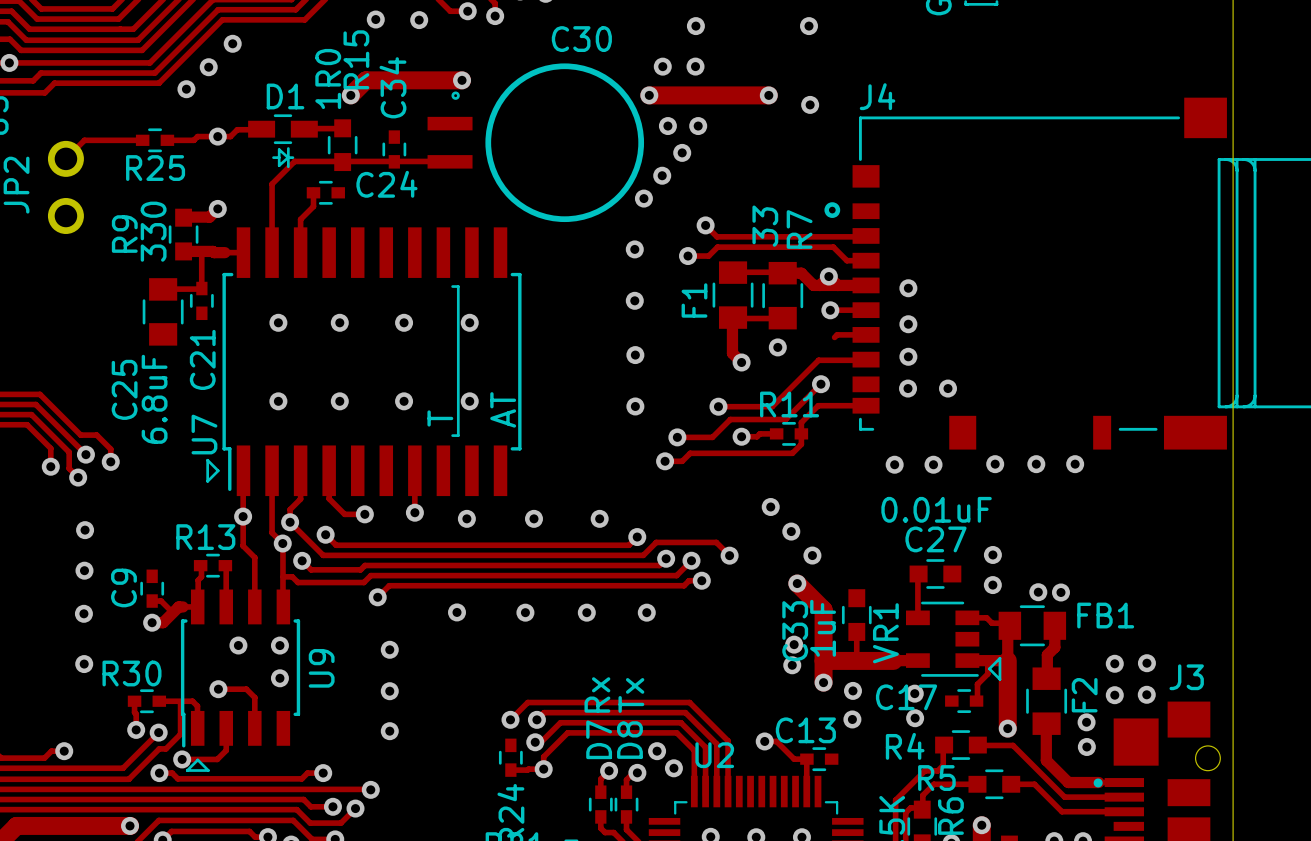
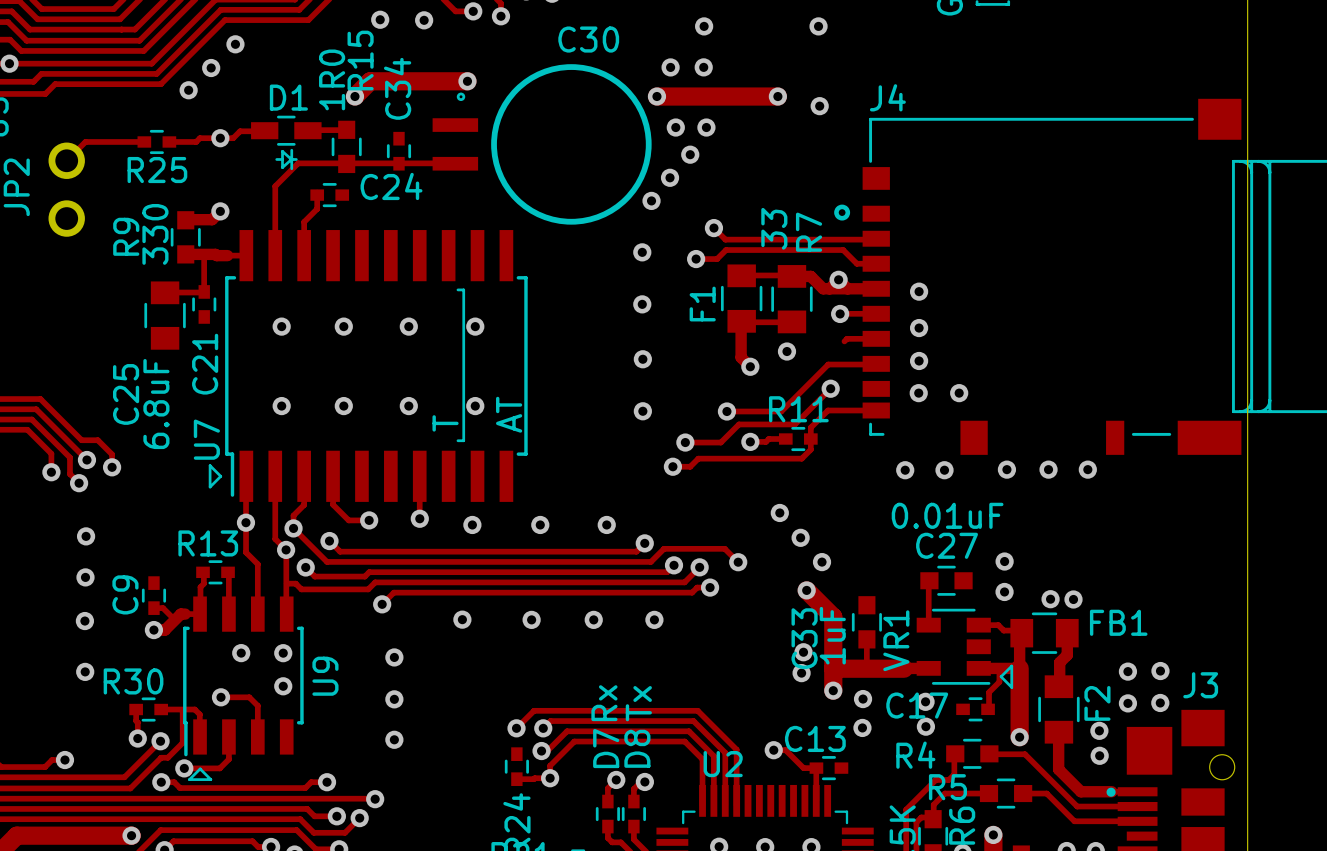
via: (657, 751) -> none
via: (673, 768) -> none

